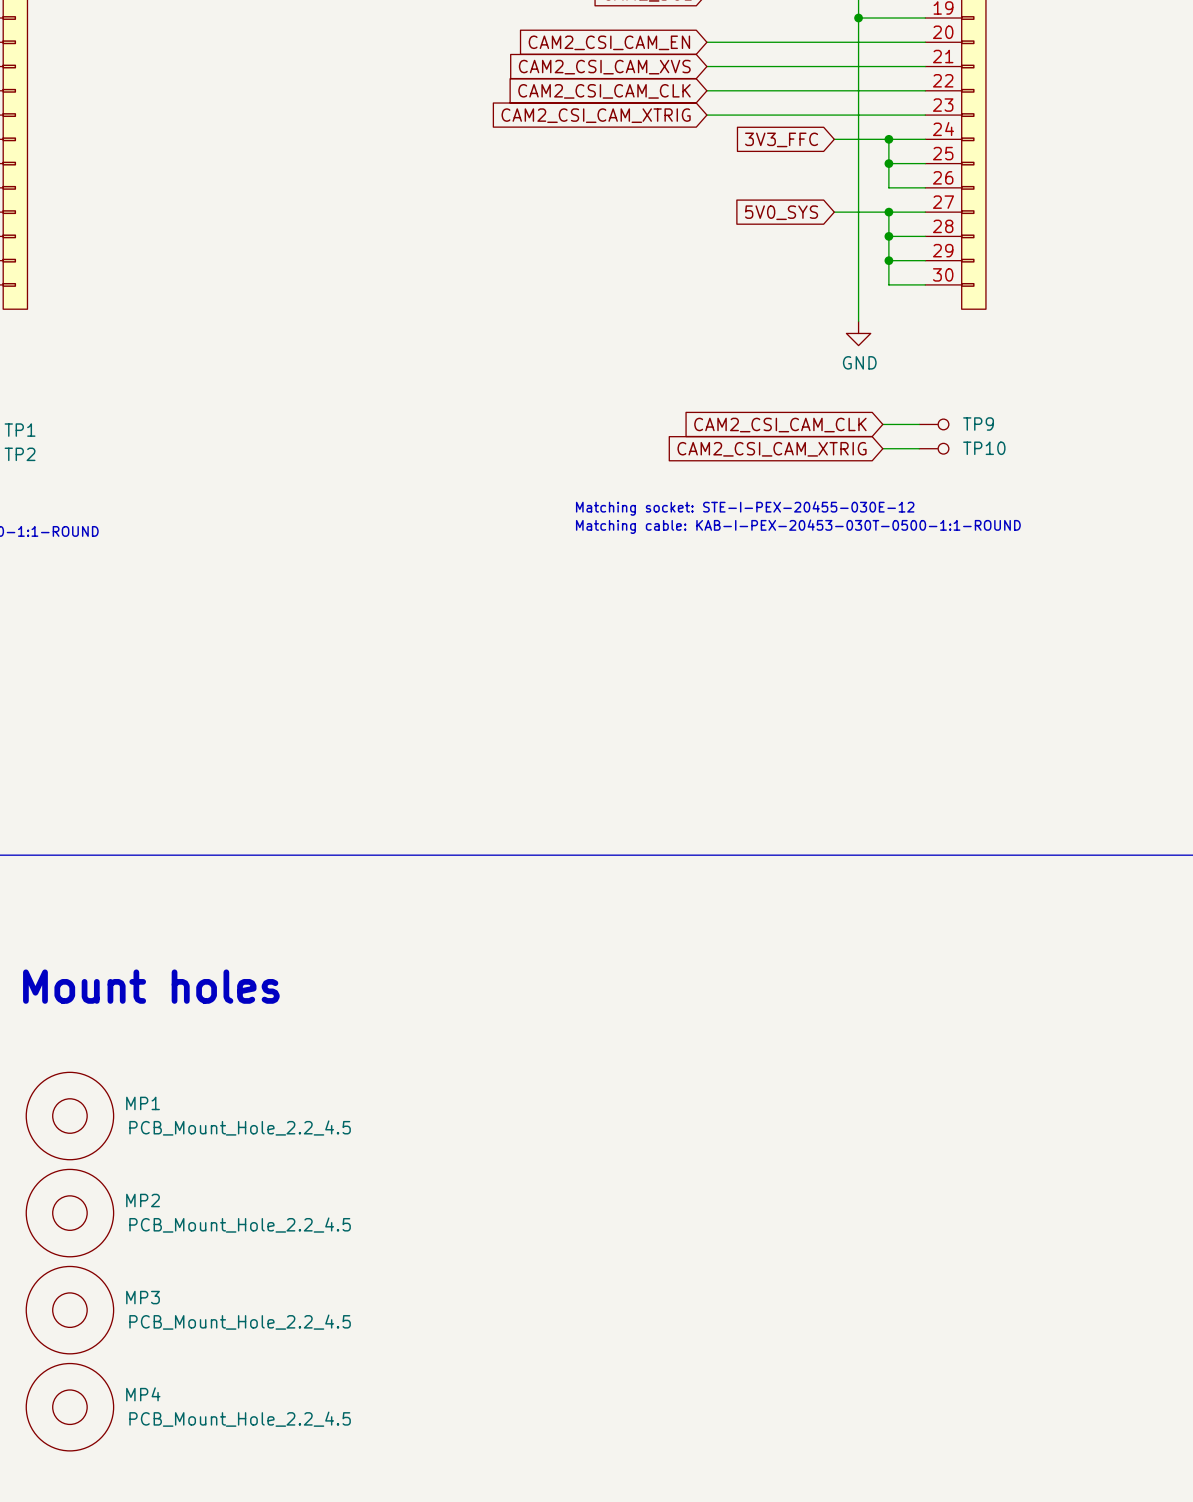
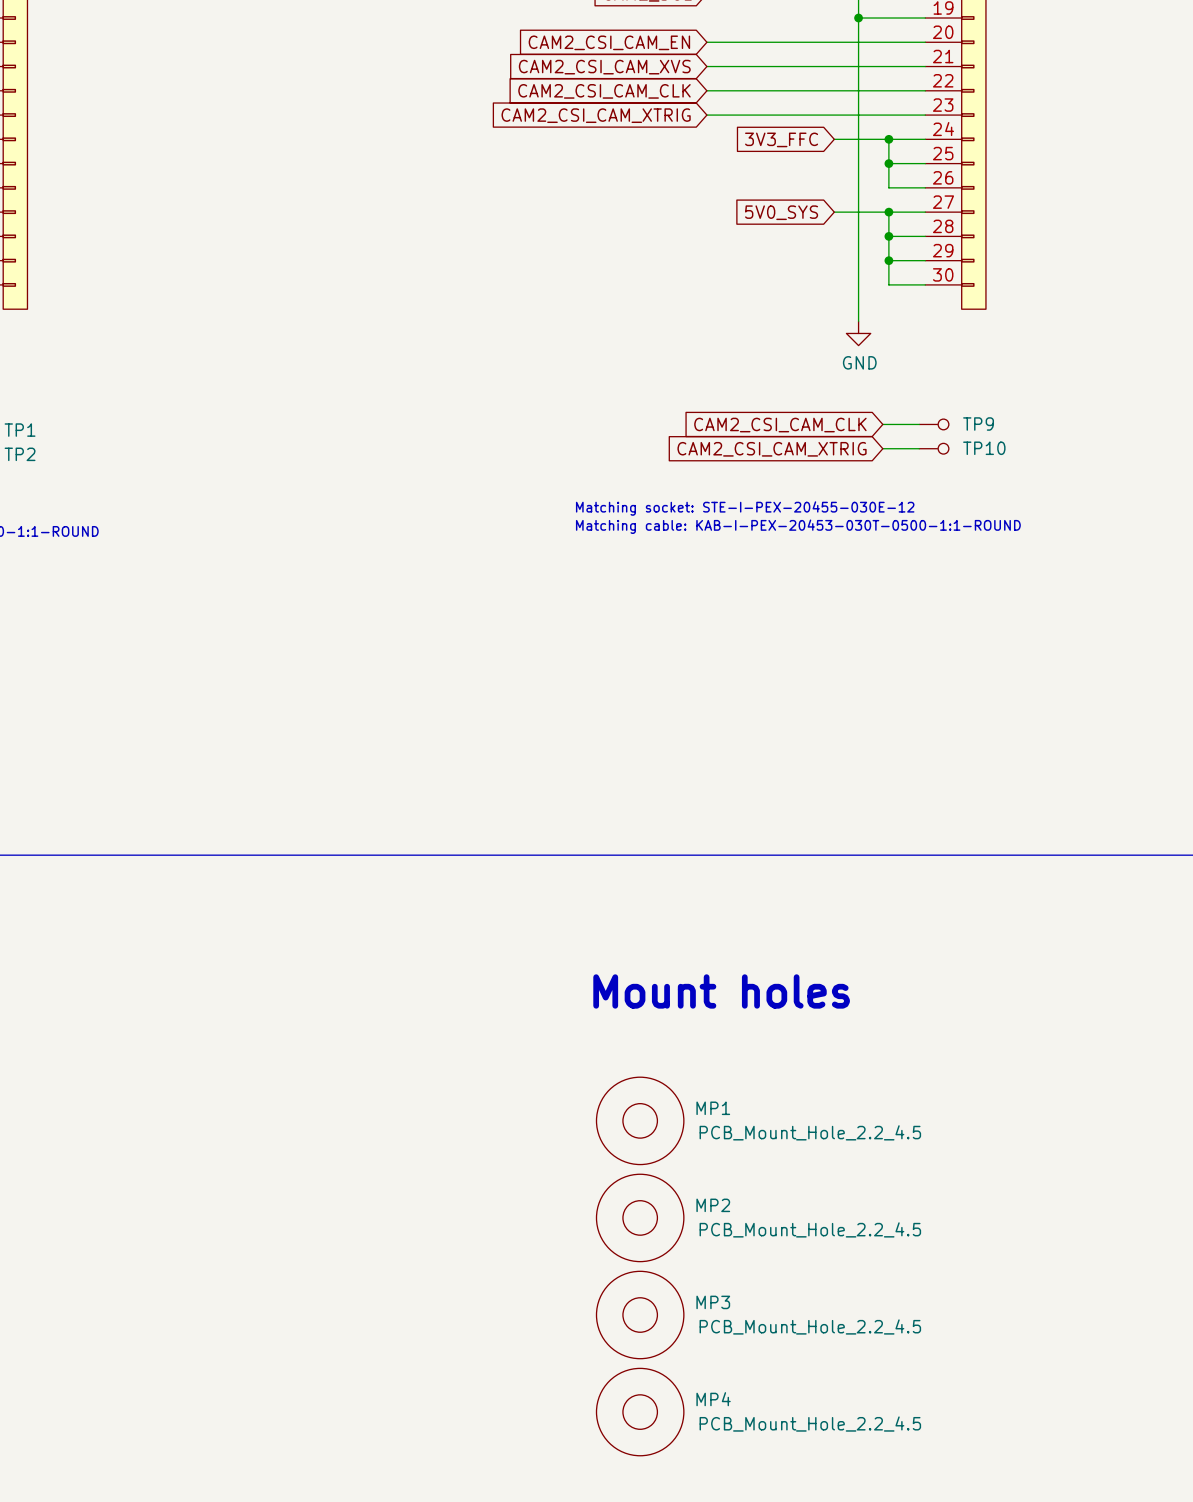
text: Mount holes (151, 986) -> none
text: none -> Mount holes (721, 991)
MP1 position: (69, 1116) -> (640, 1120)
MP2 position: (69, 1213) -> (640, 1217)
MP3 position: (69, 1310) -> (640, 1315)
MP4 position: (69, 1407) -> (640, 1412)

